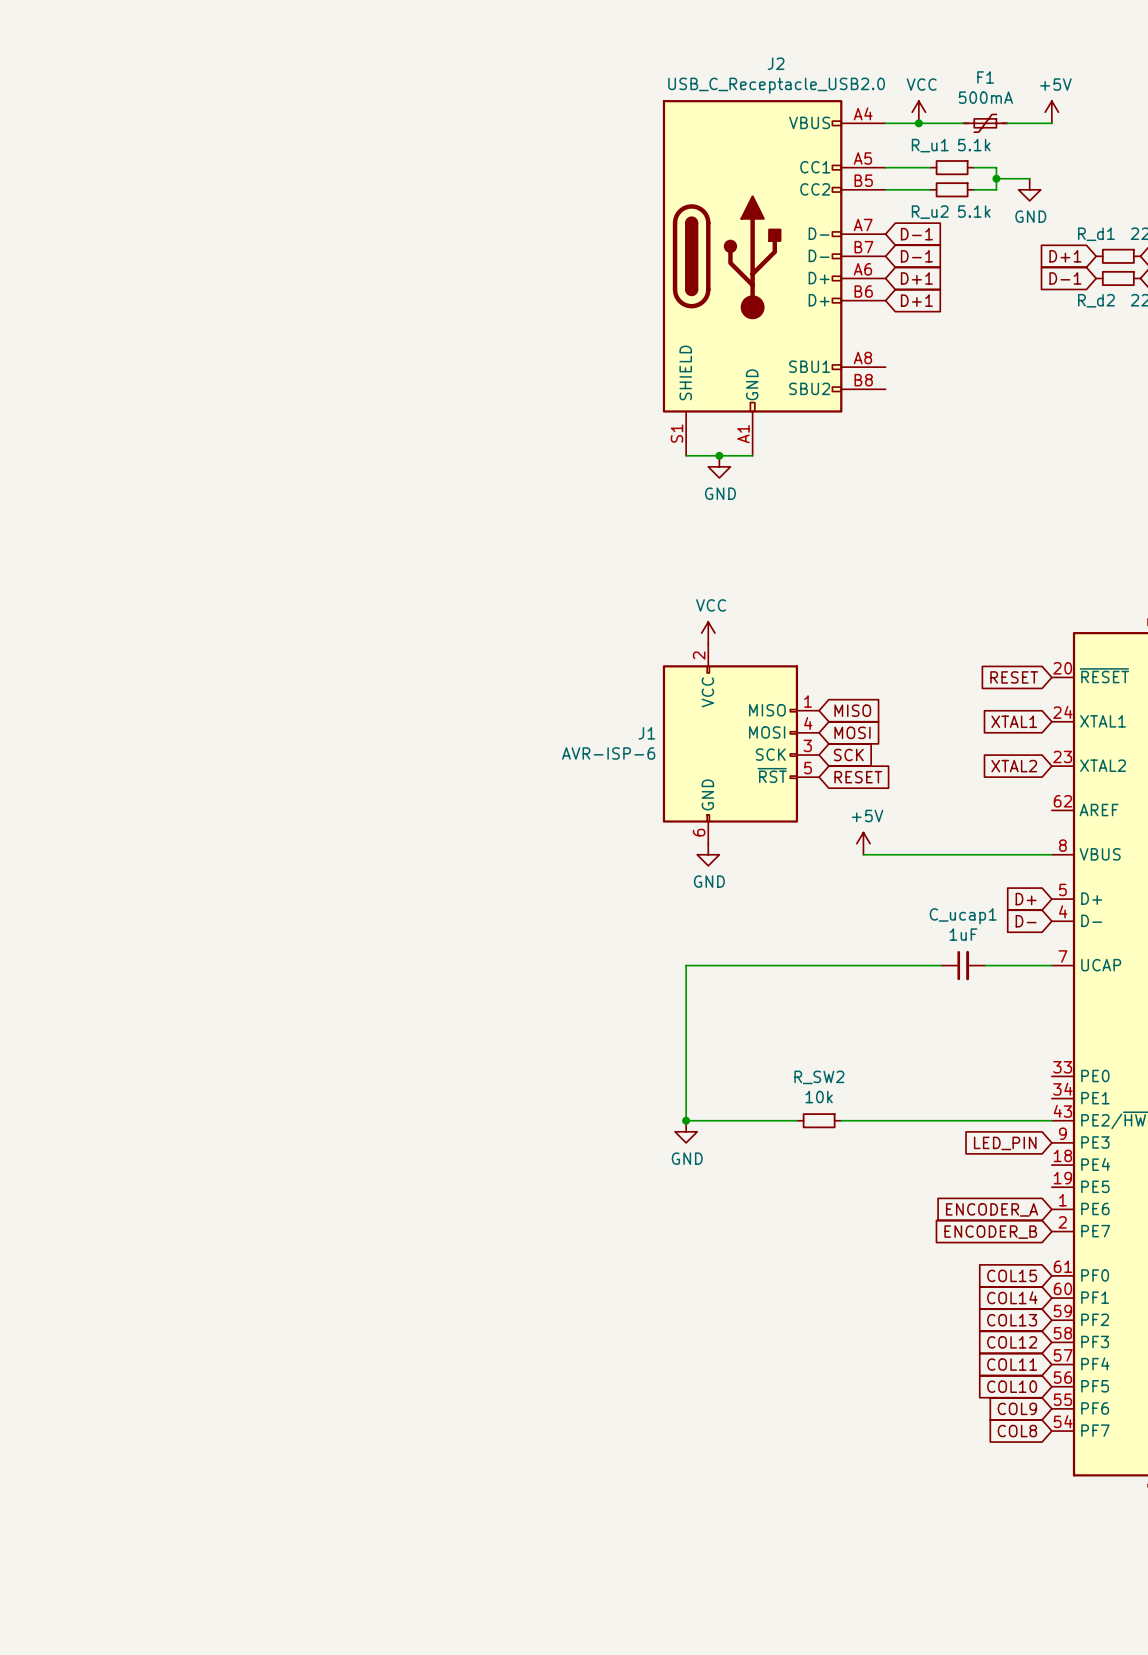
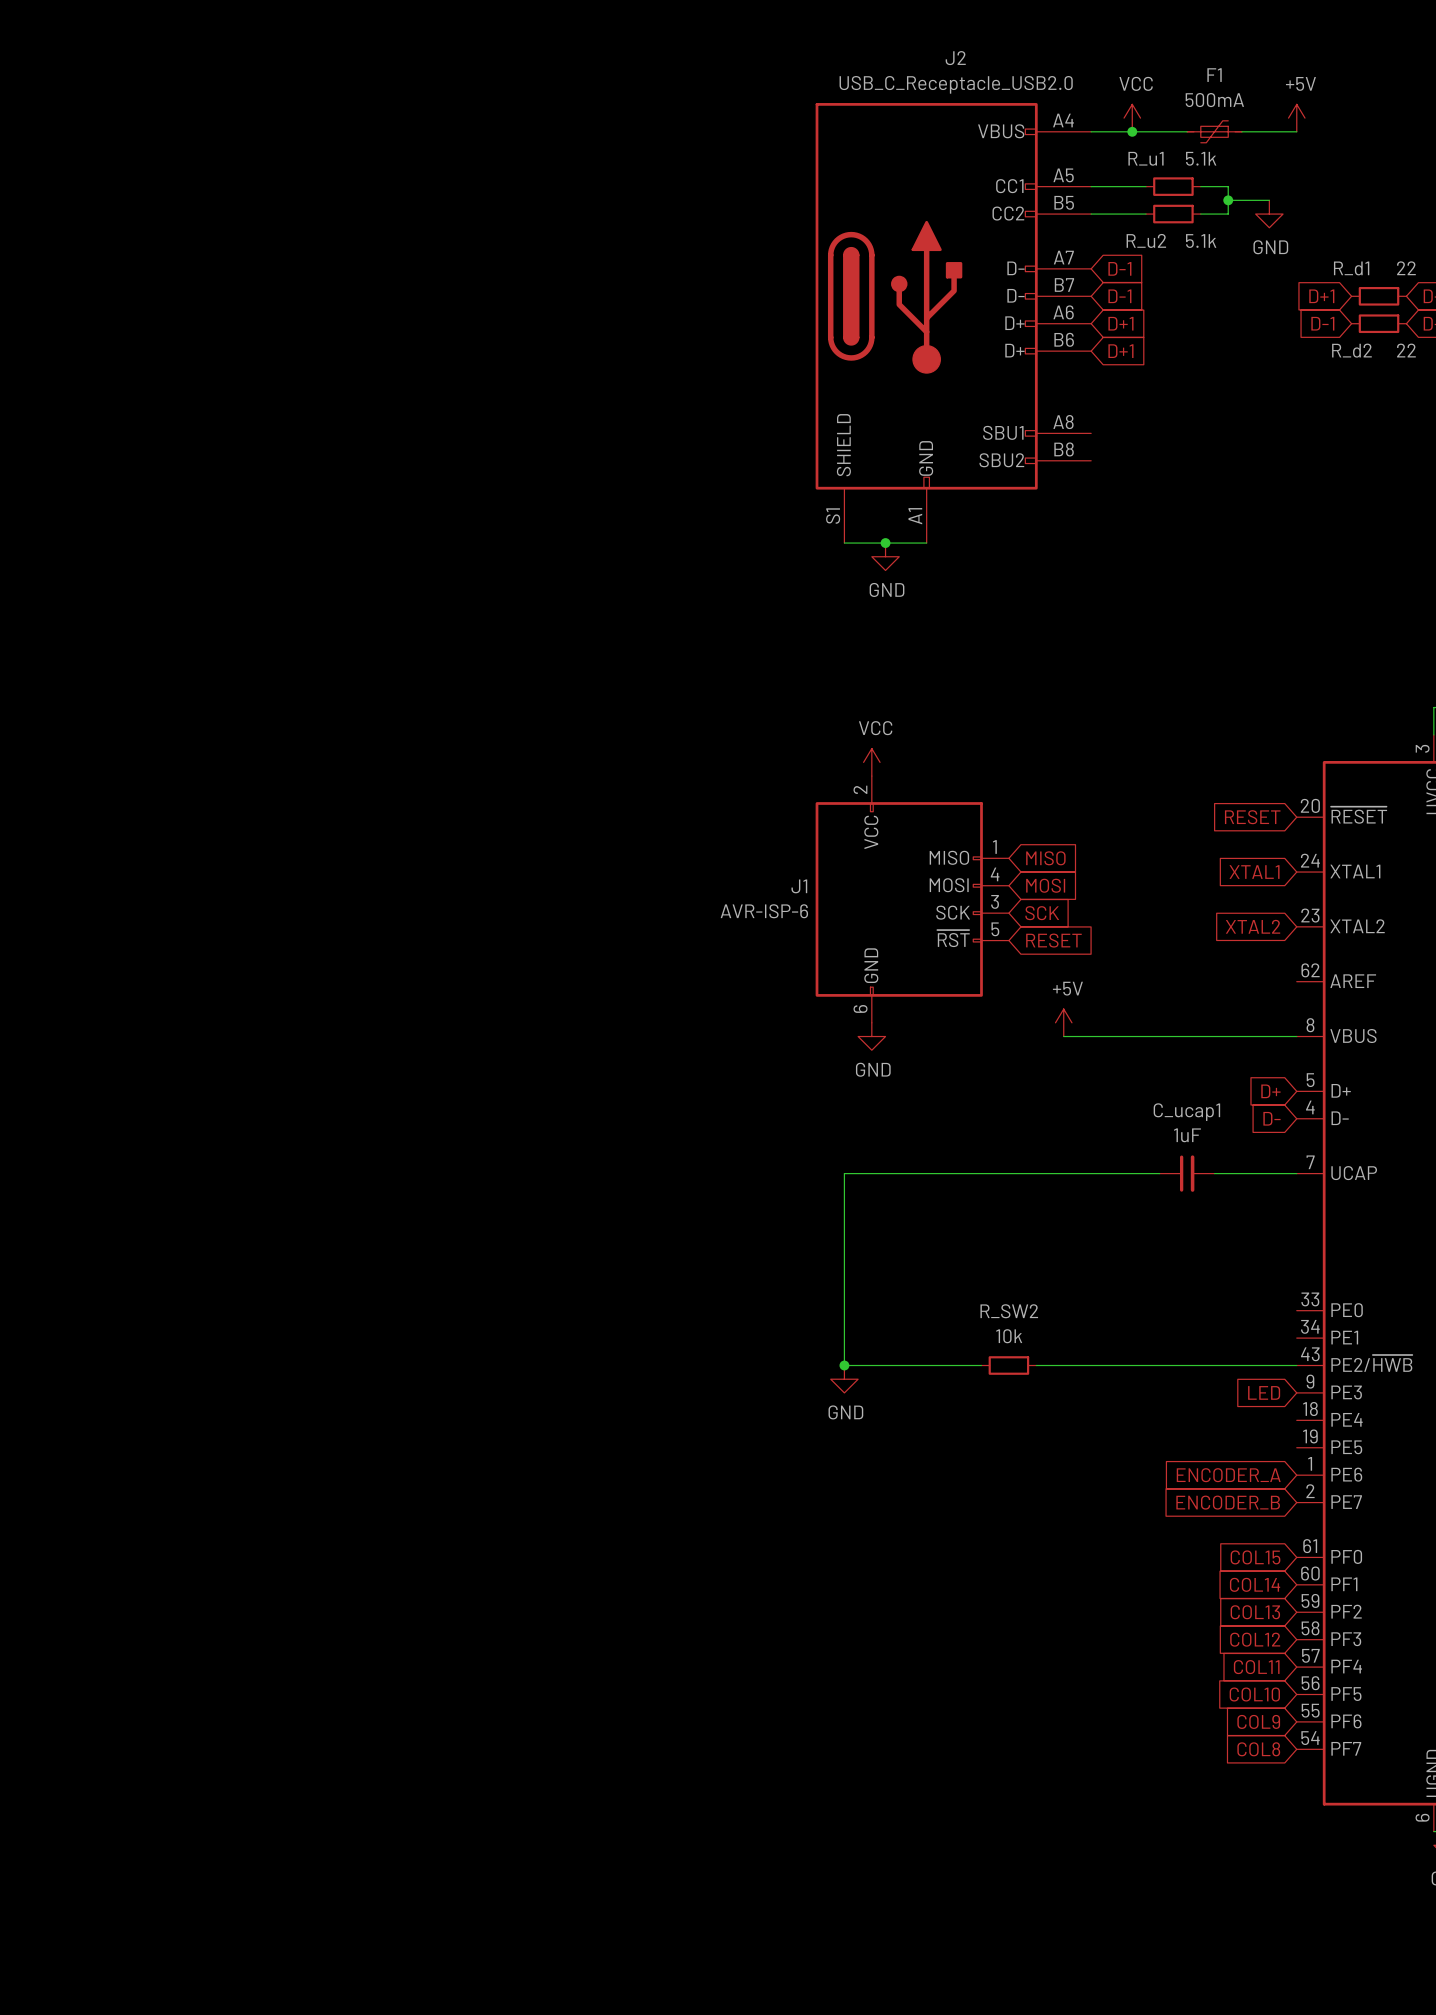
global label: LED_PIN (1005, 1143) -> LED (1264, 1392)

